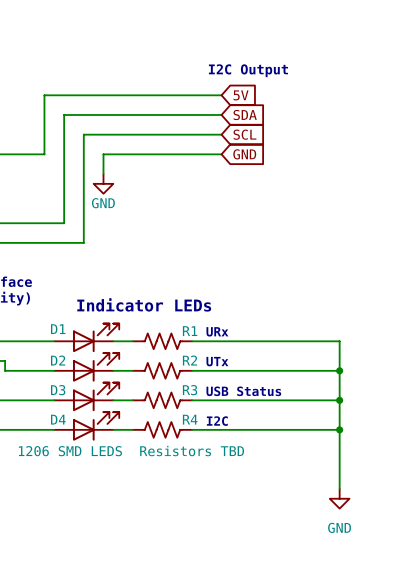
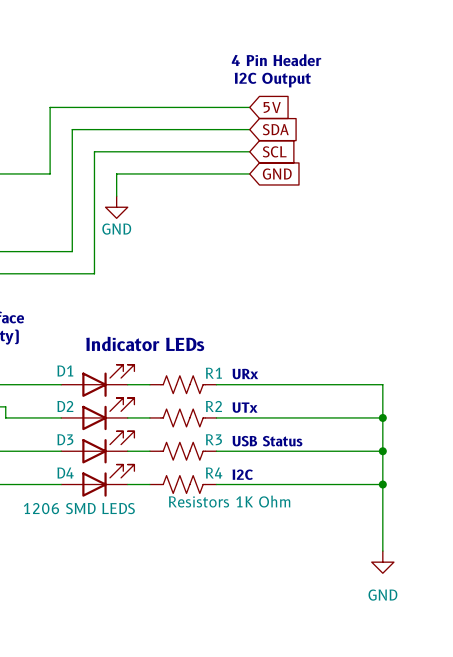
text: none -> 4 Pin Header (276, 60)
R1 value: Resistors TBD (192, 451) -> Resistors 1K Ohm (229, 501)

